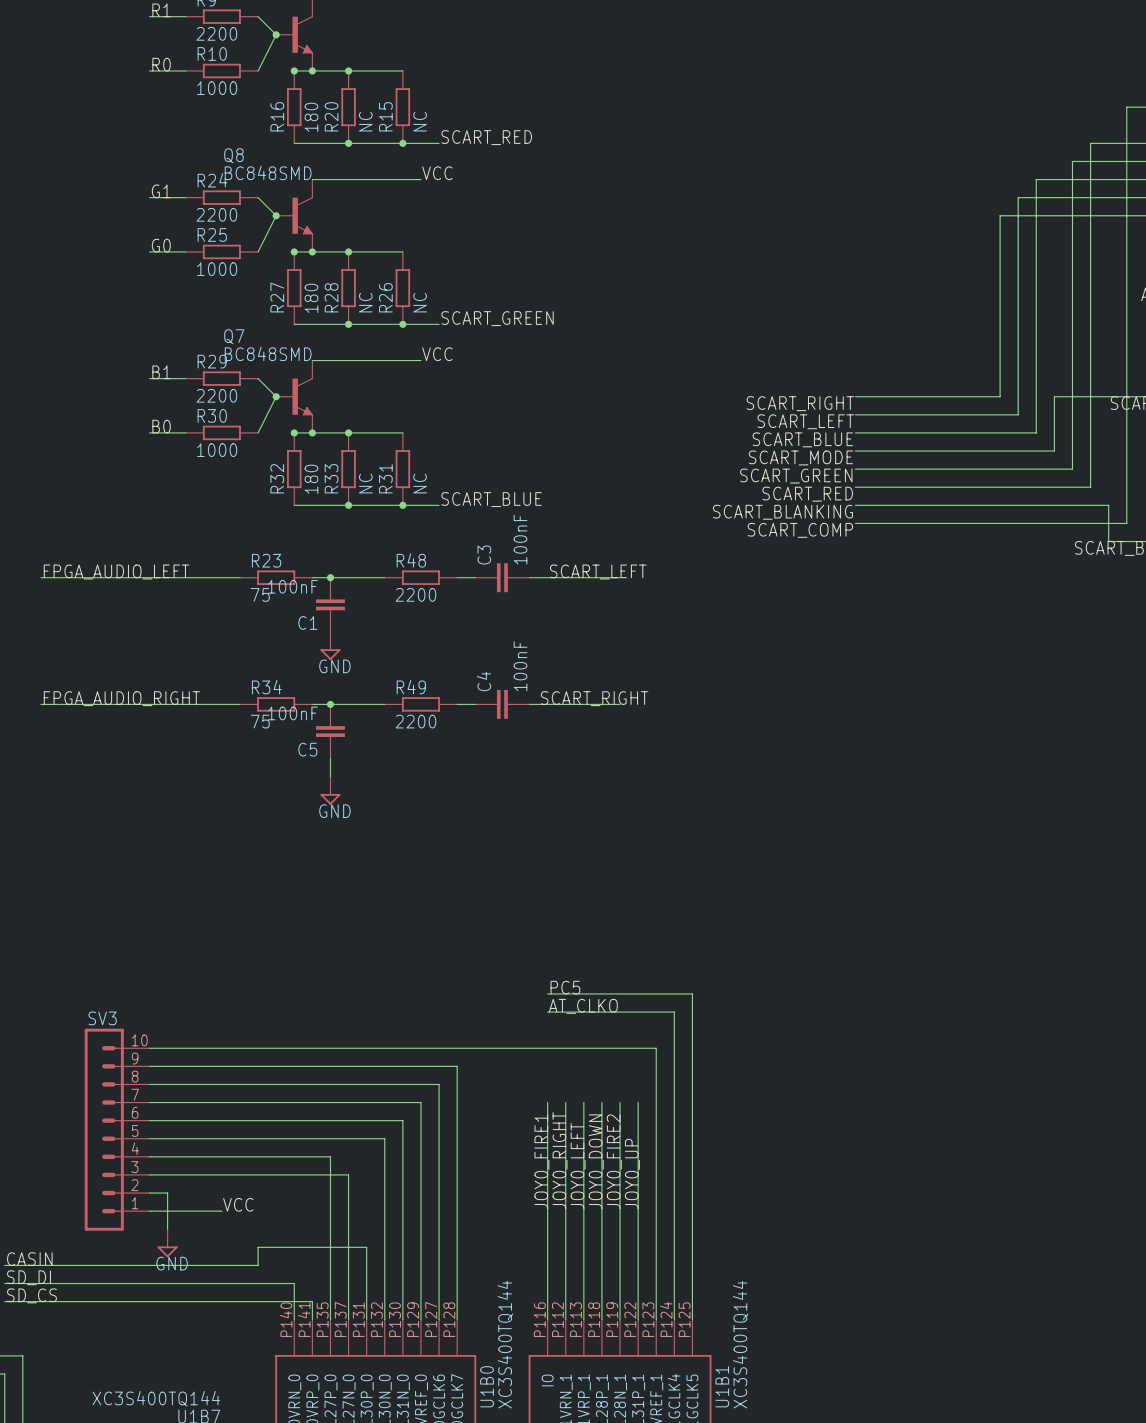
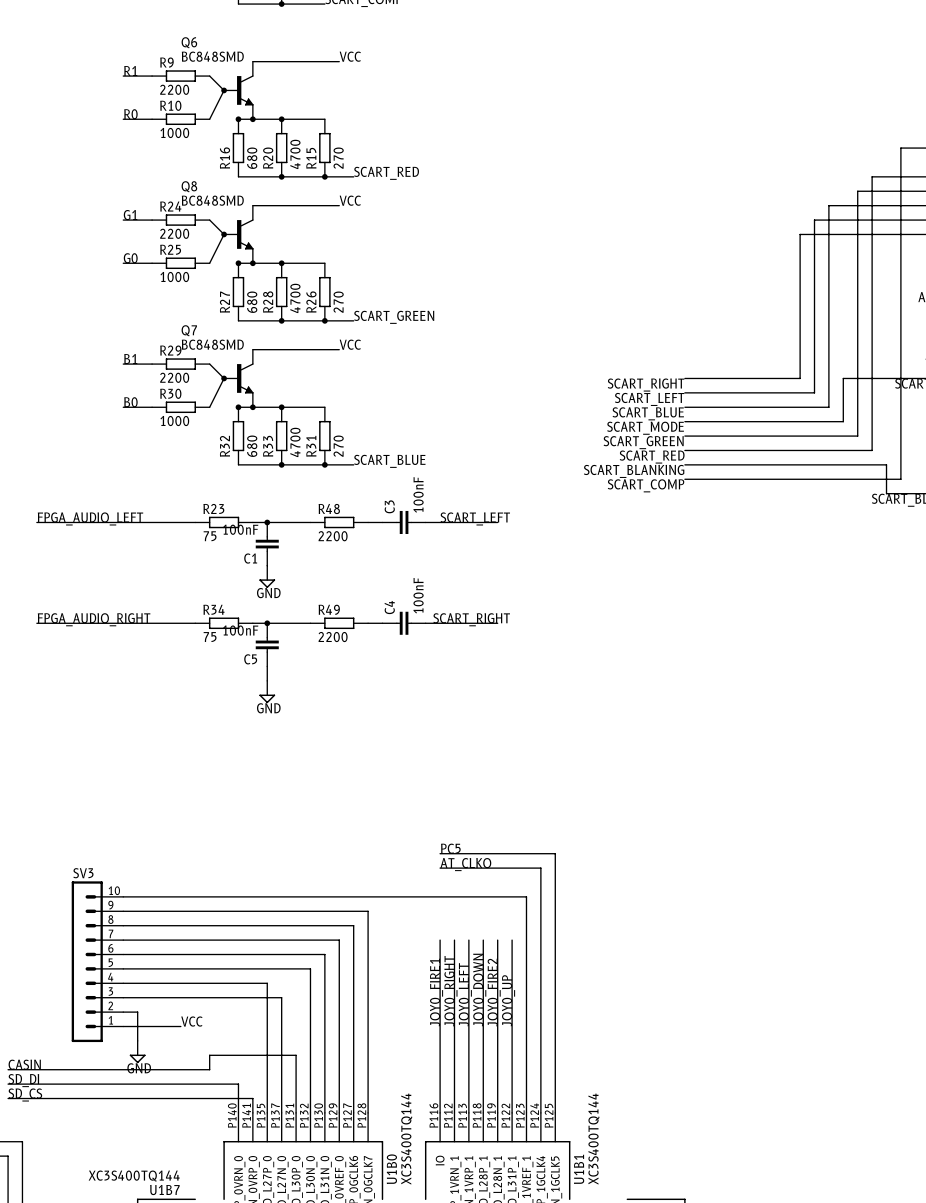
R16 value: 180 (311, 117) -> 680 (252, 158)
R20 value: NC (365, 121) -> 4700 (295, 154)
R15 value: NC (420, 121) -> 270 (338, 158)
R27 value: 180 (311, 298) -> 680 (252, 302)
R28 value: NC (365, 302) -> 4700 (295, 298)
R26 value: NC (420, 302) -> 270 (338, 302)
R32 value: 180 (311, 479) -> 680 (252, 446)
R33 value: NC (365, 483) -> 4700 (295, 442)
R31 value: NC (420, 483) -> 270 (338, 446)

